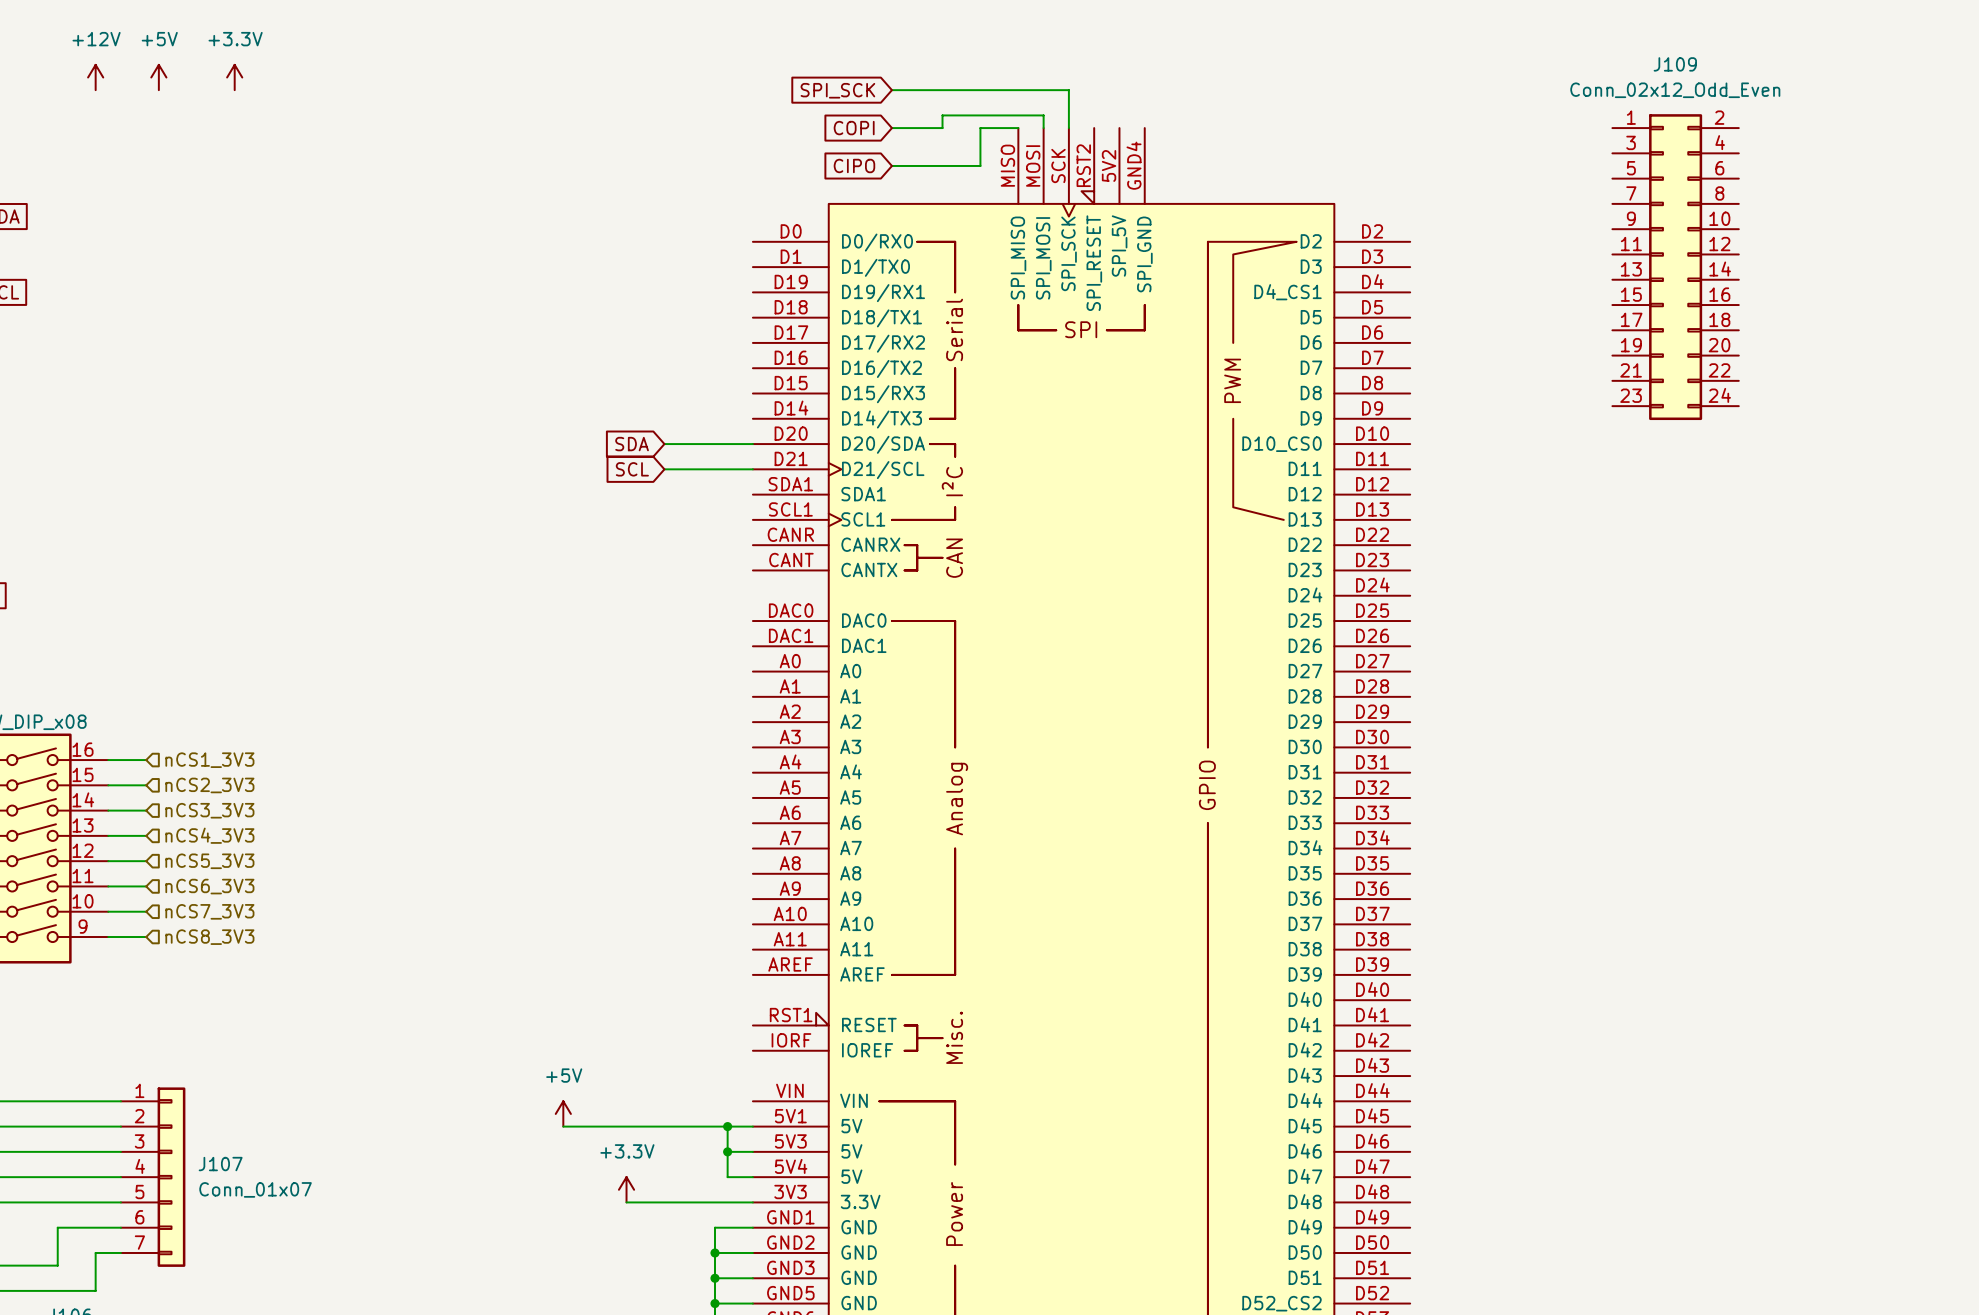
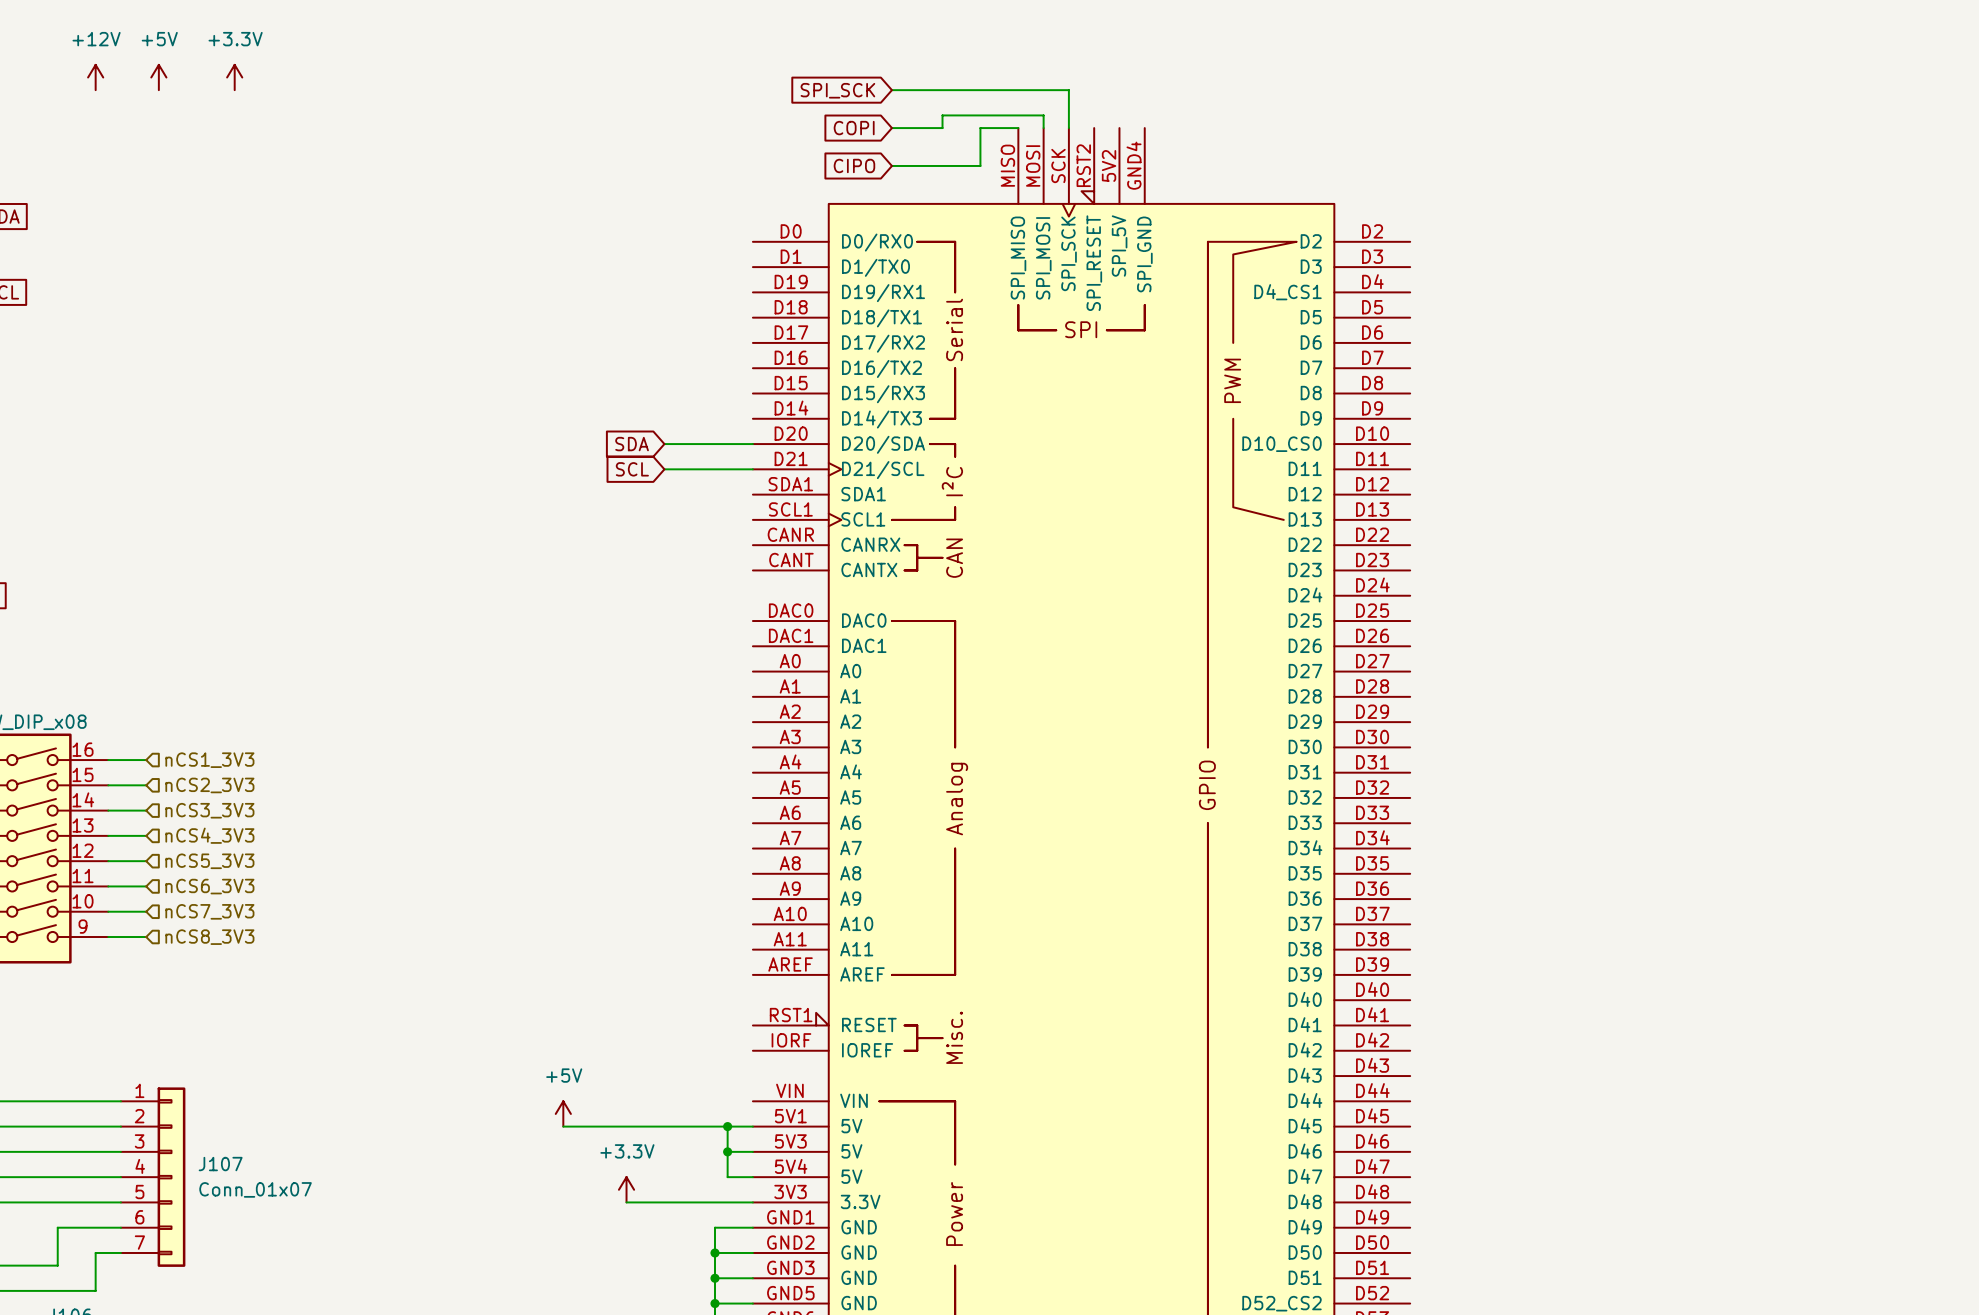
J109: Conn_02x12_Odd_Even (1675, 267) -> none

